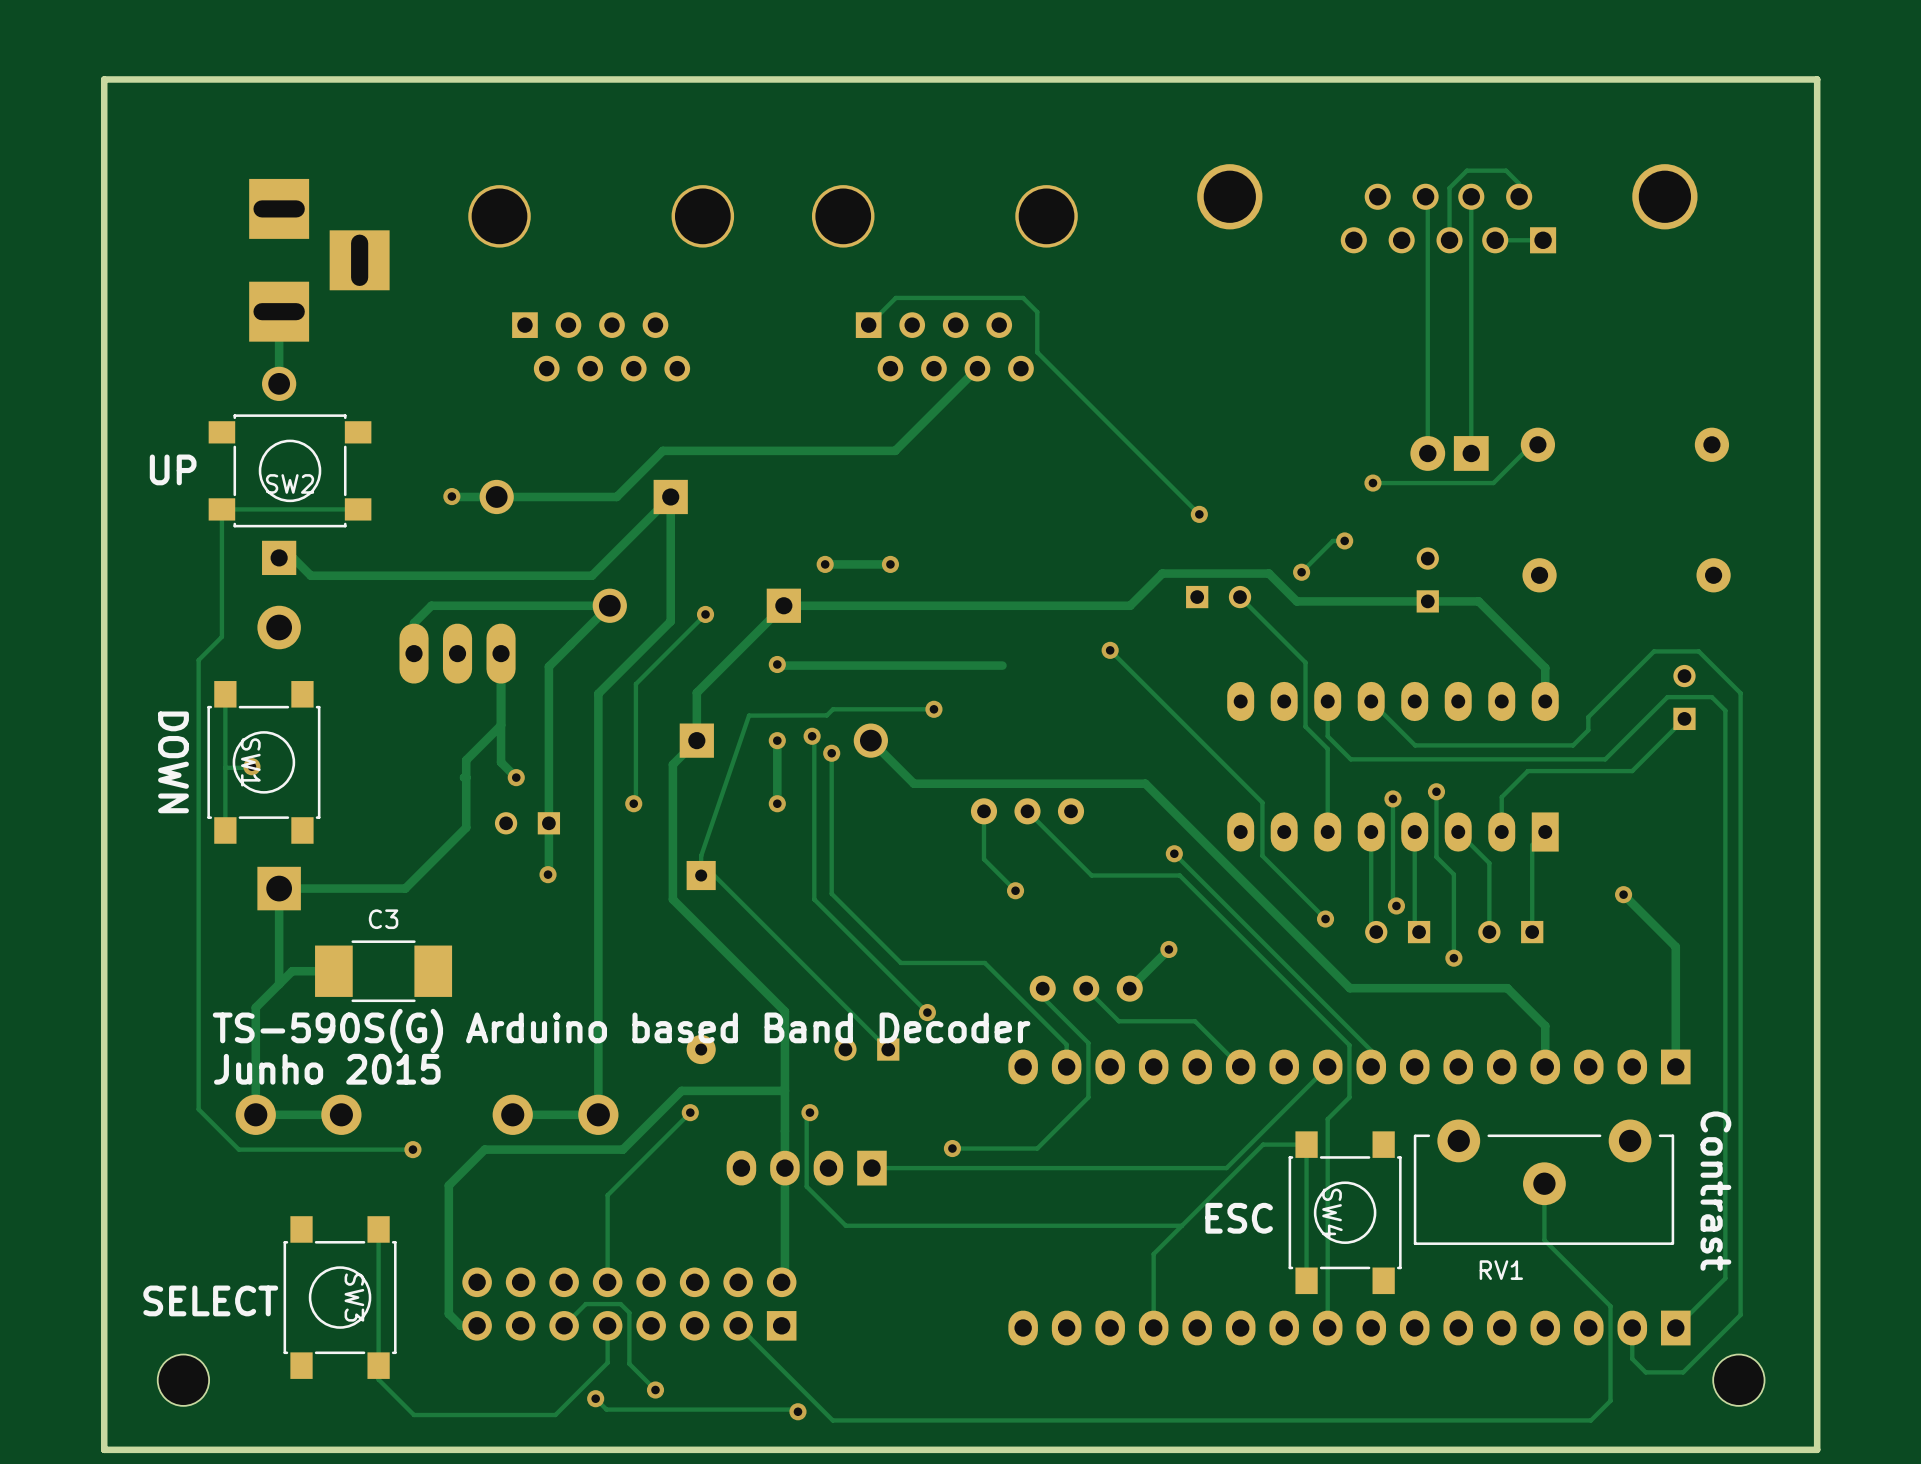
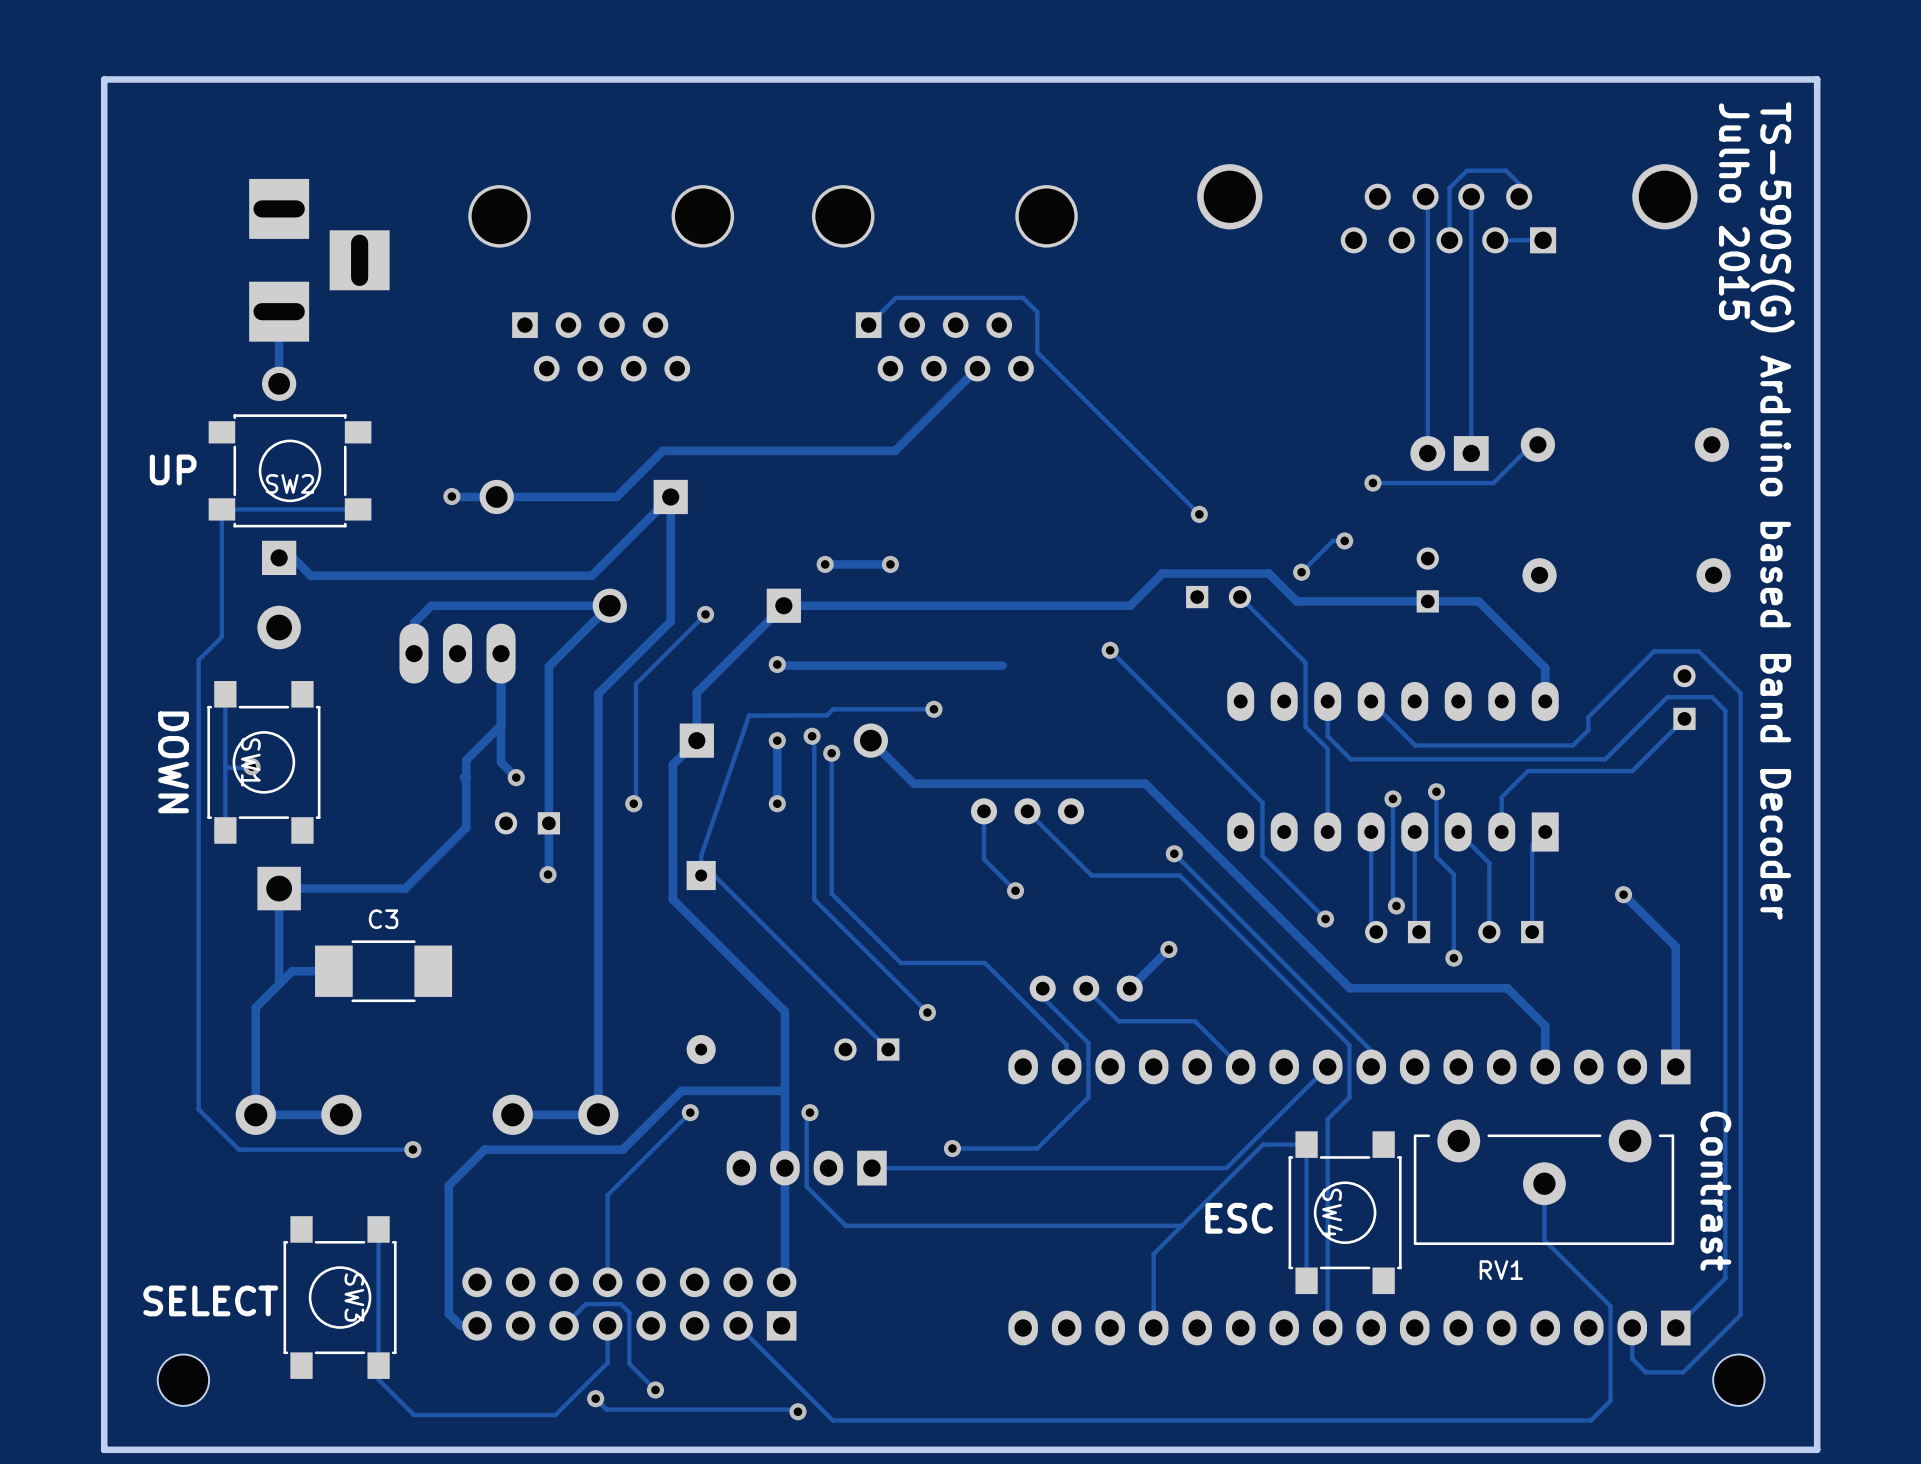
text: none -> Julho 2015 (1734, 211)
text: none -> TS-590S(G) Arduino based Band Decoder (1772, 510)
text: TS-590S(G) Arduino based Band Decoder (621, 1030) -> none
text: Junho 2015 (327, 1069) -> none

